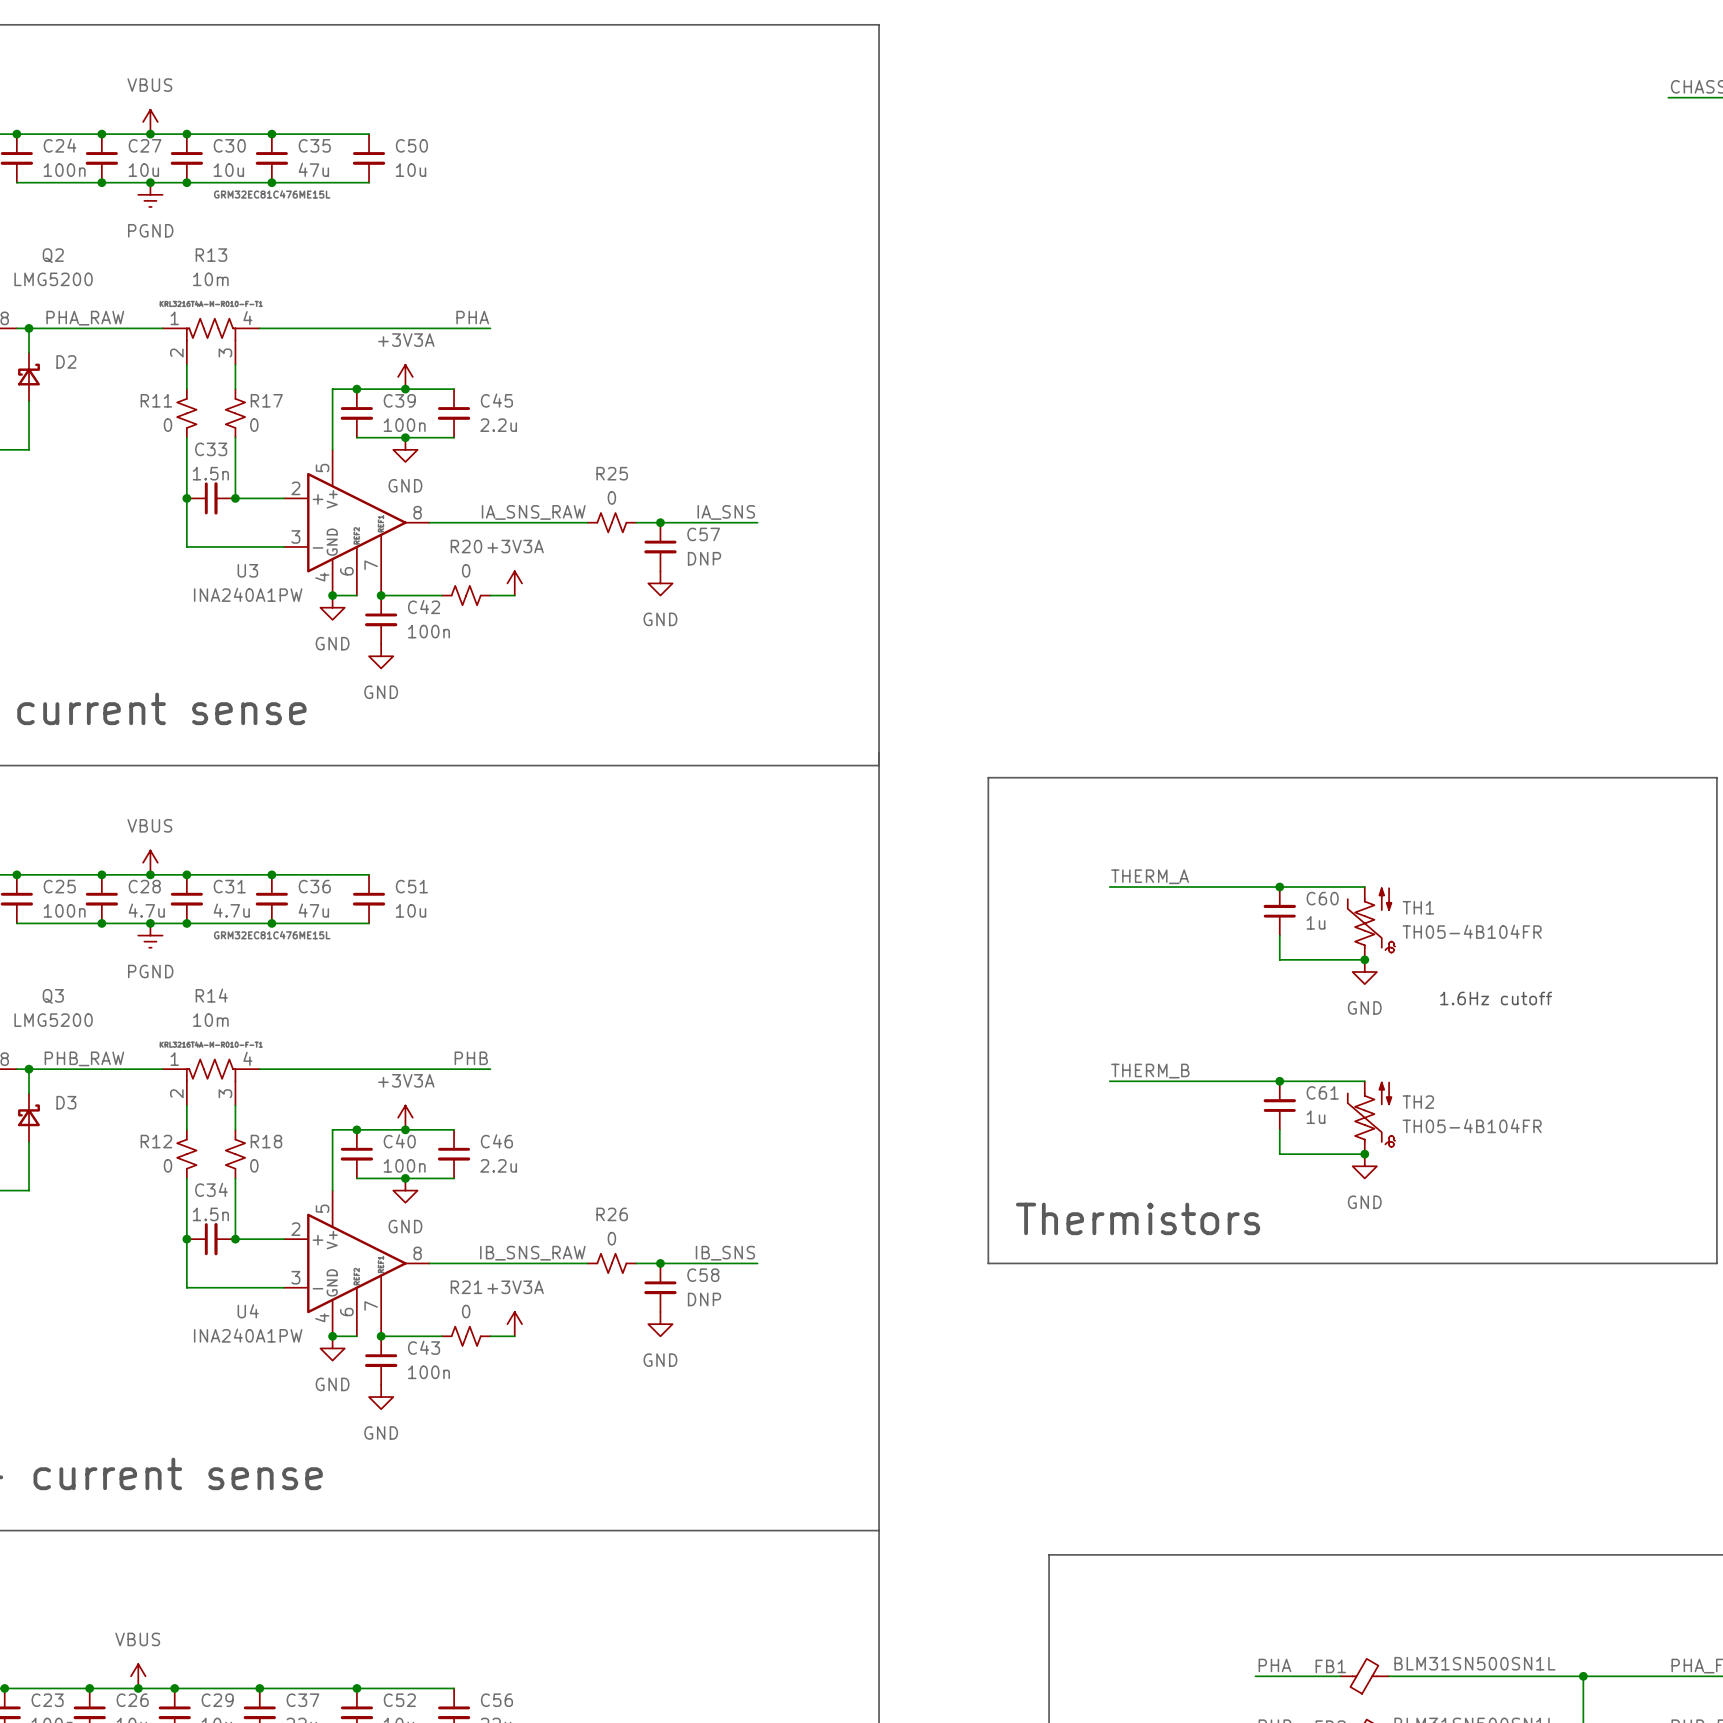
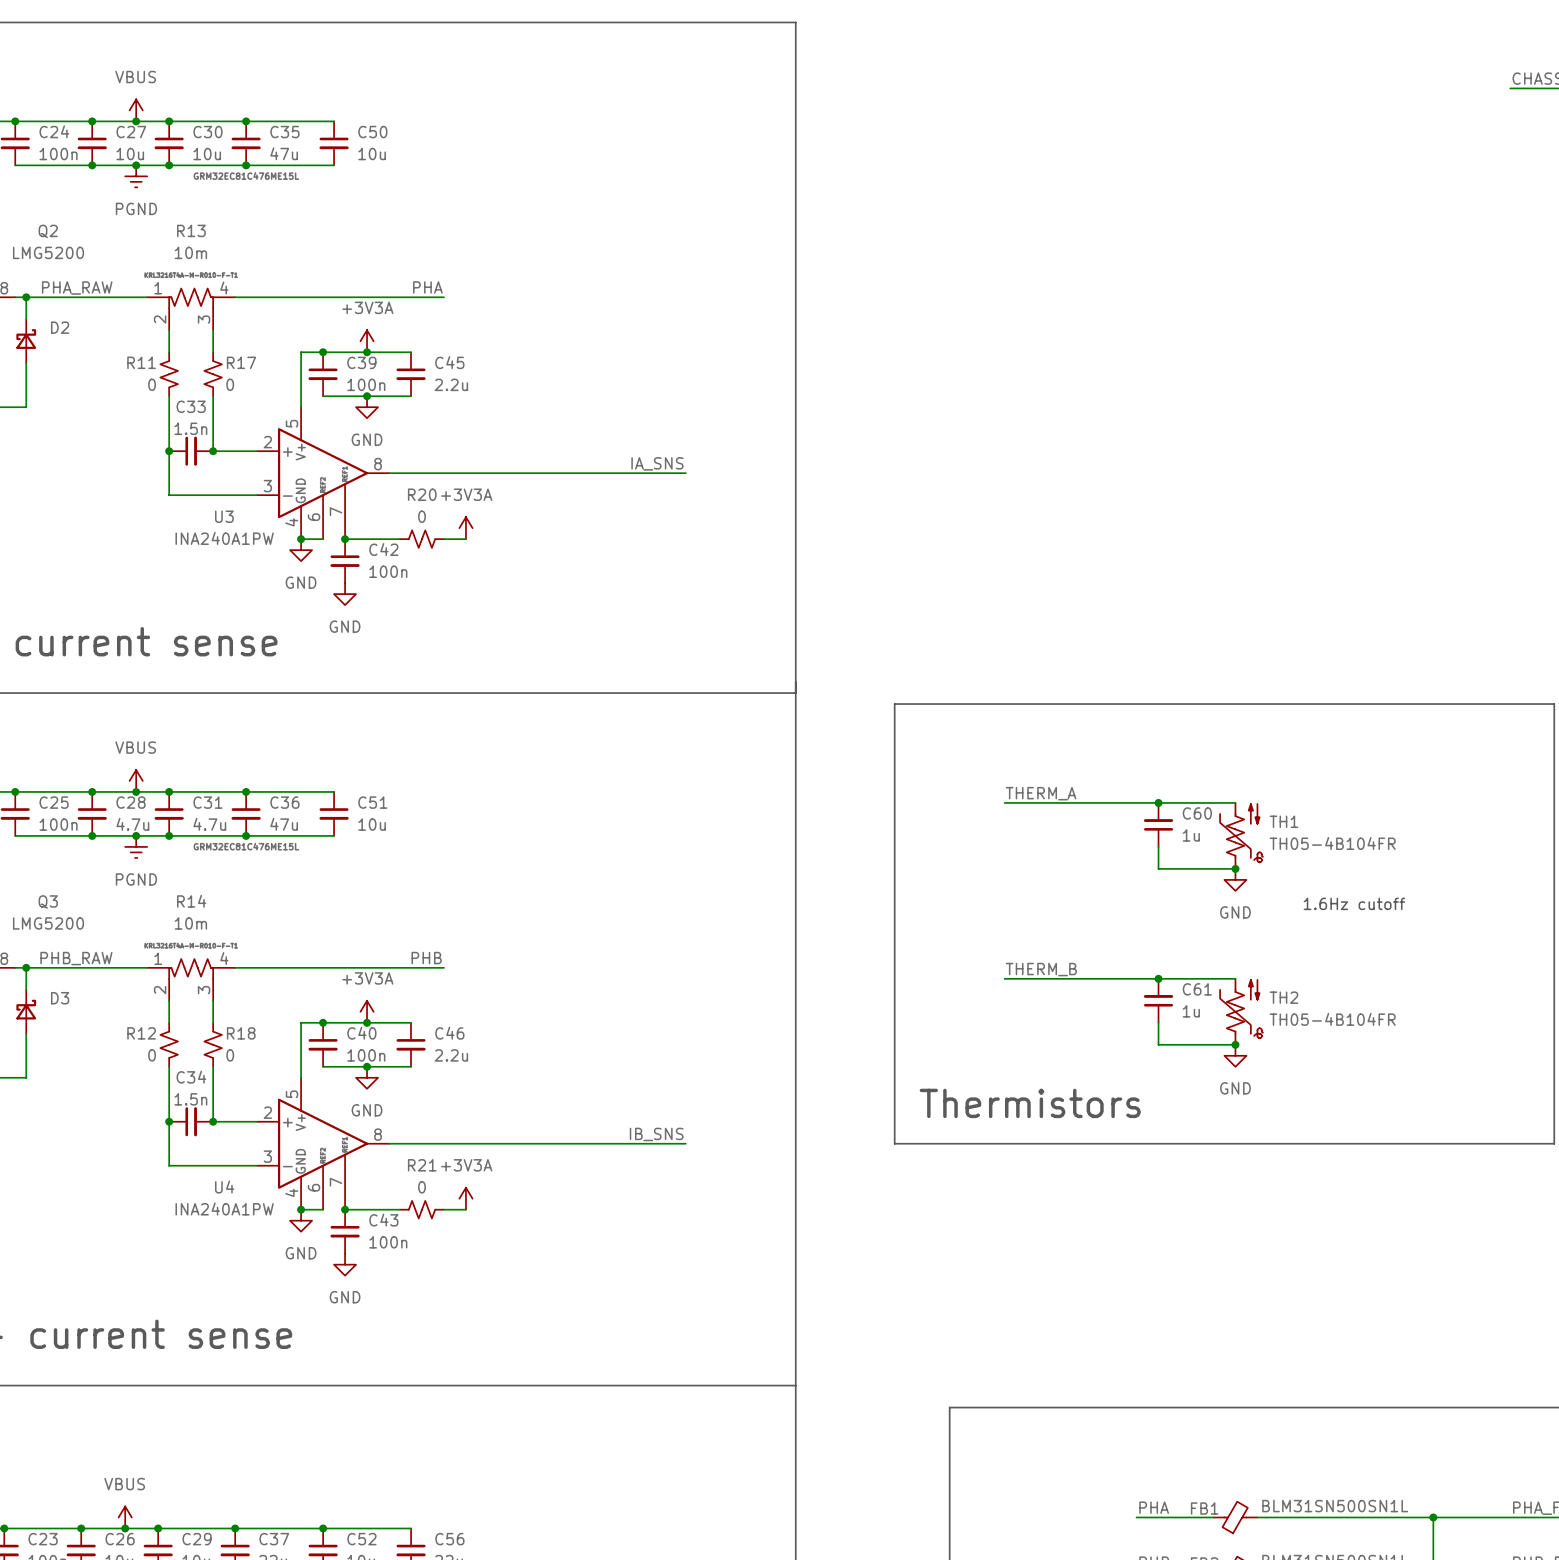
label: IA_SNS_RAW (533, 512) -> none
R25: 0 (611, 522) -> none
junction: (660, 522) -> none
C57: DNP (660, 546) -> none
power symbol: GND (660, 583) -> none
label: IB_SNS_RAW (532, 1253) -> none
R26: 0 (611, 1263) -> none
junction: (660, 1263) -> none
C58: DNP (660, 1287) -> none
power symbol: GND (660, 1324) -> none

